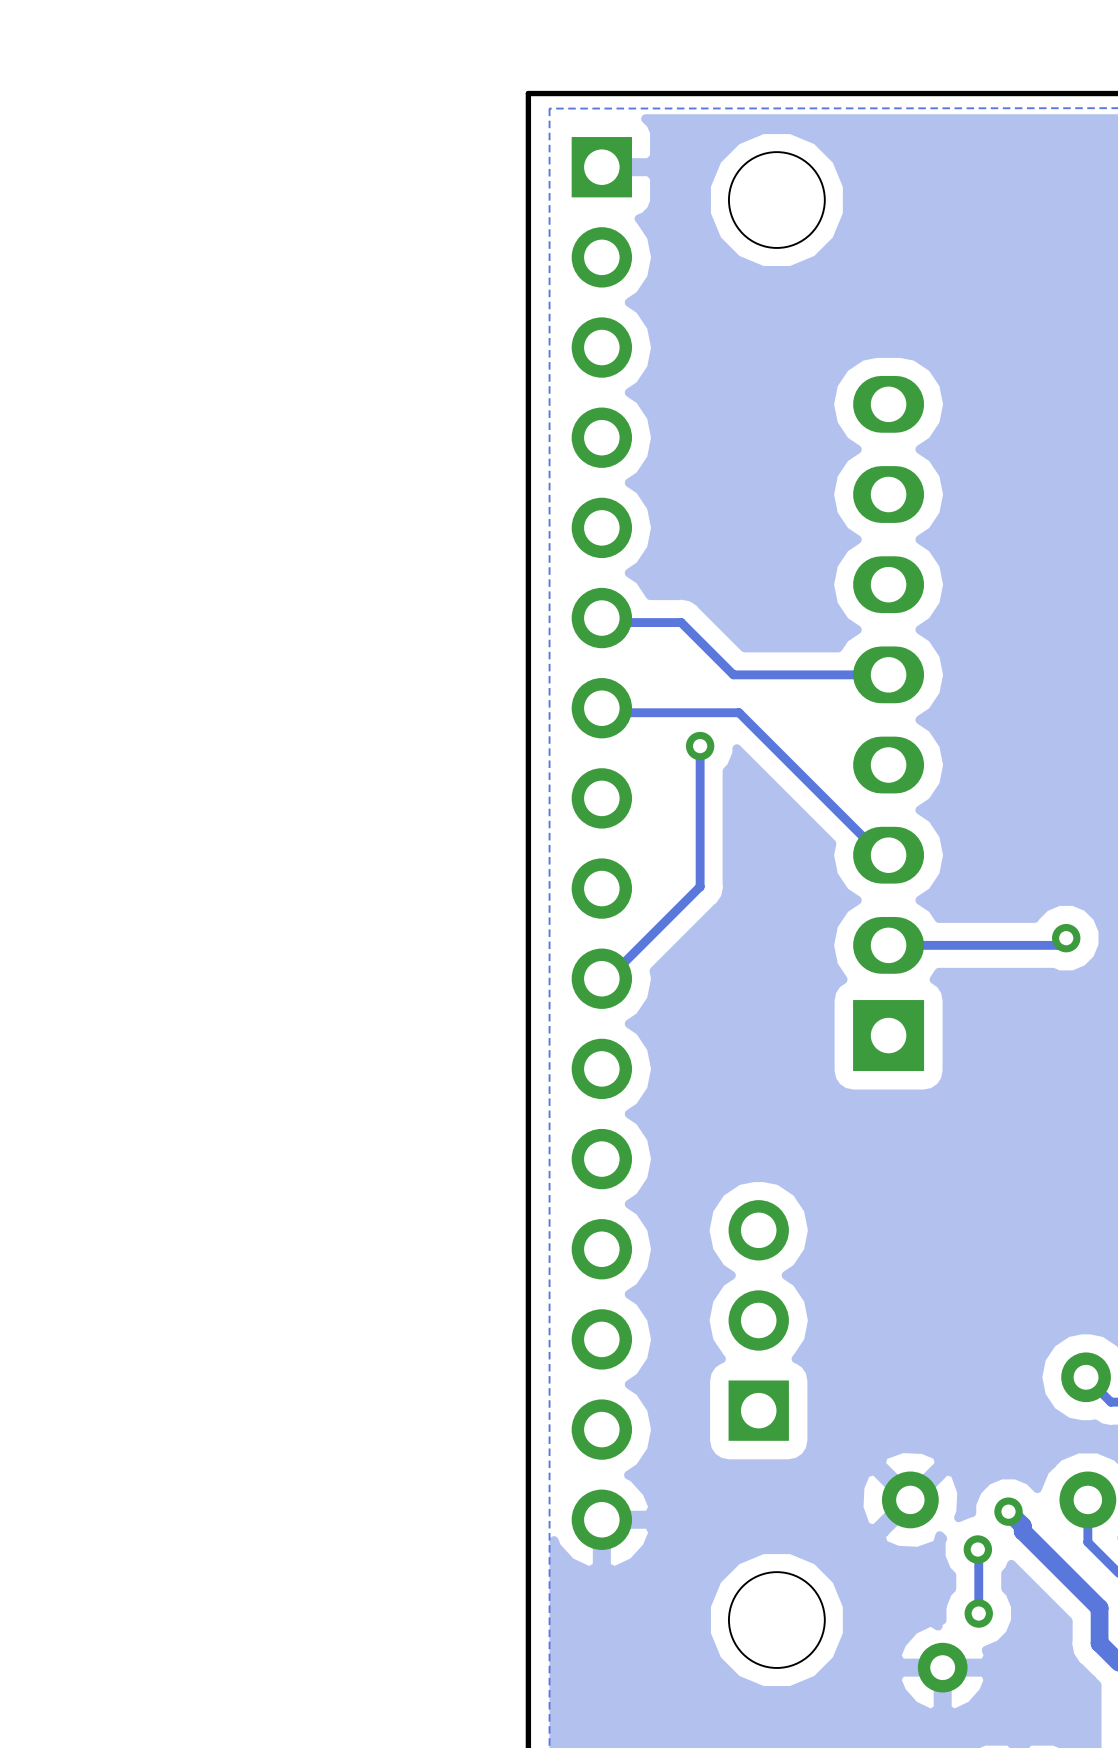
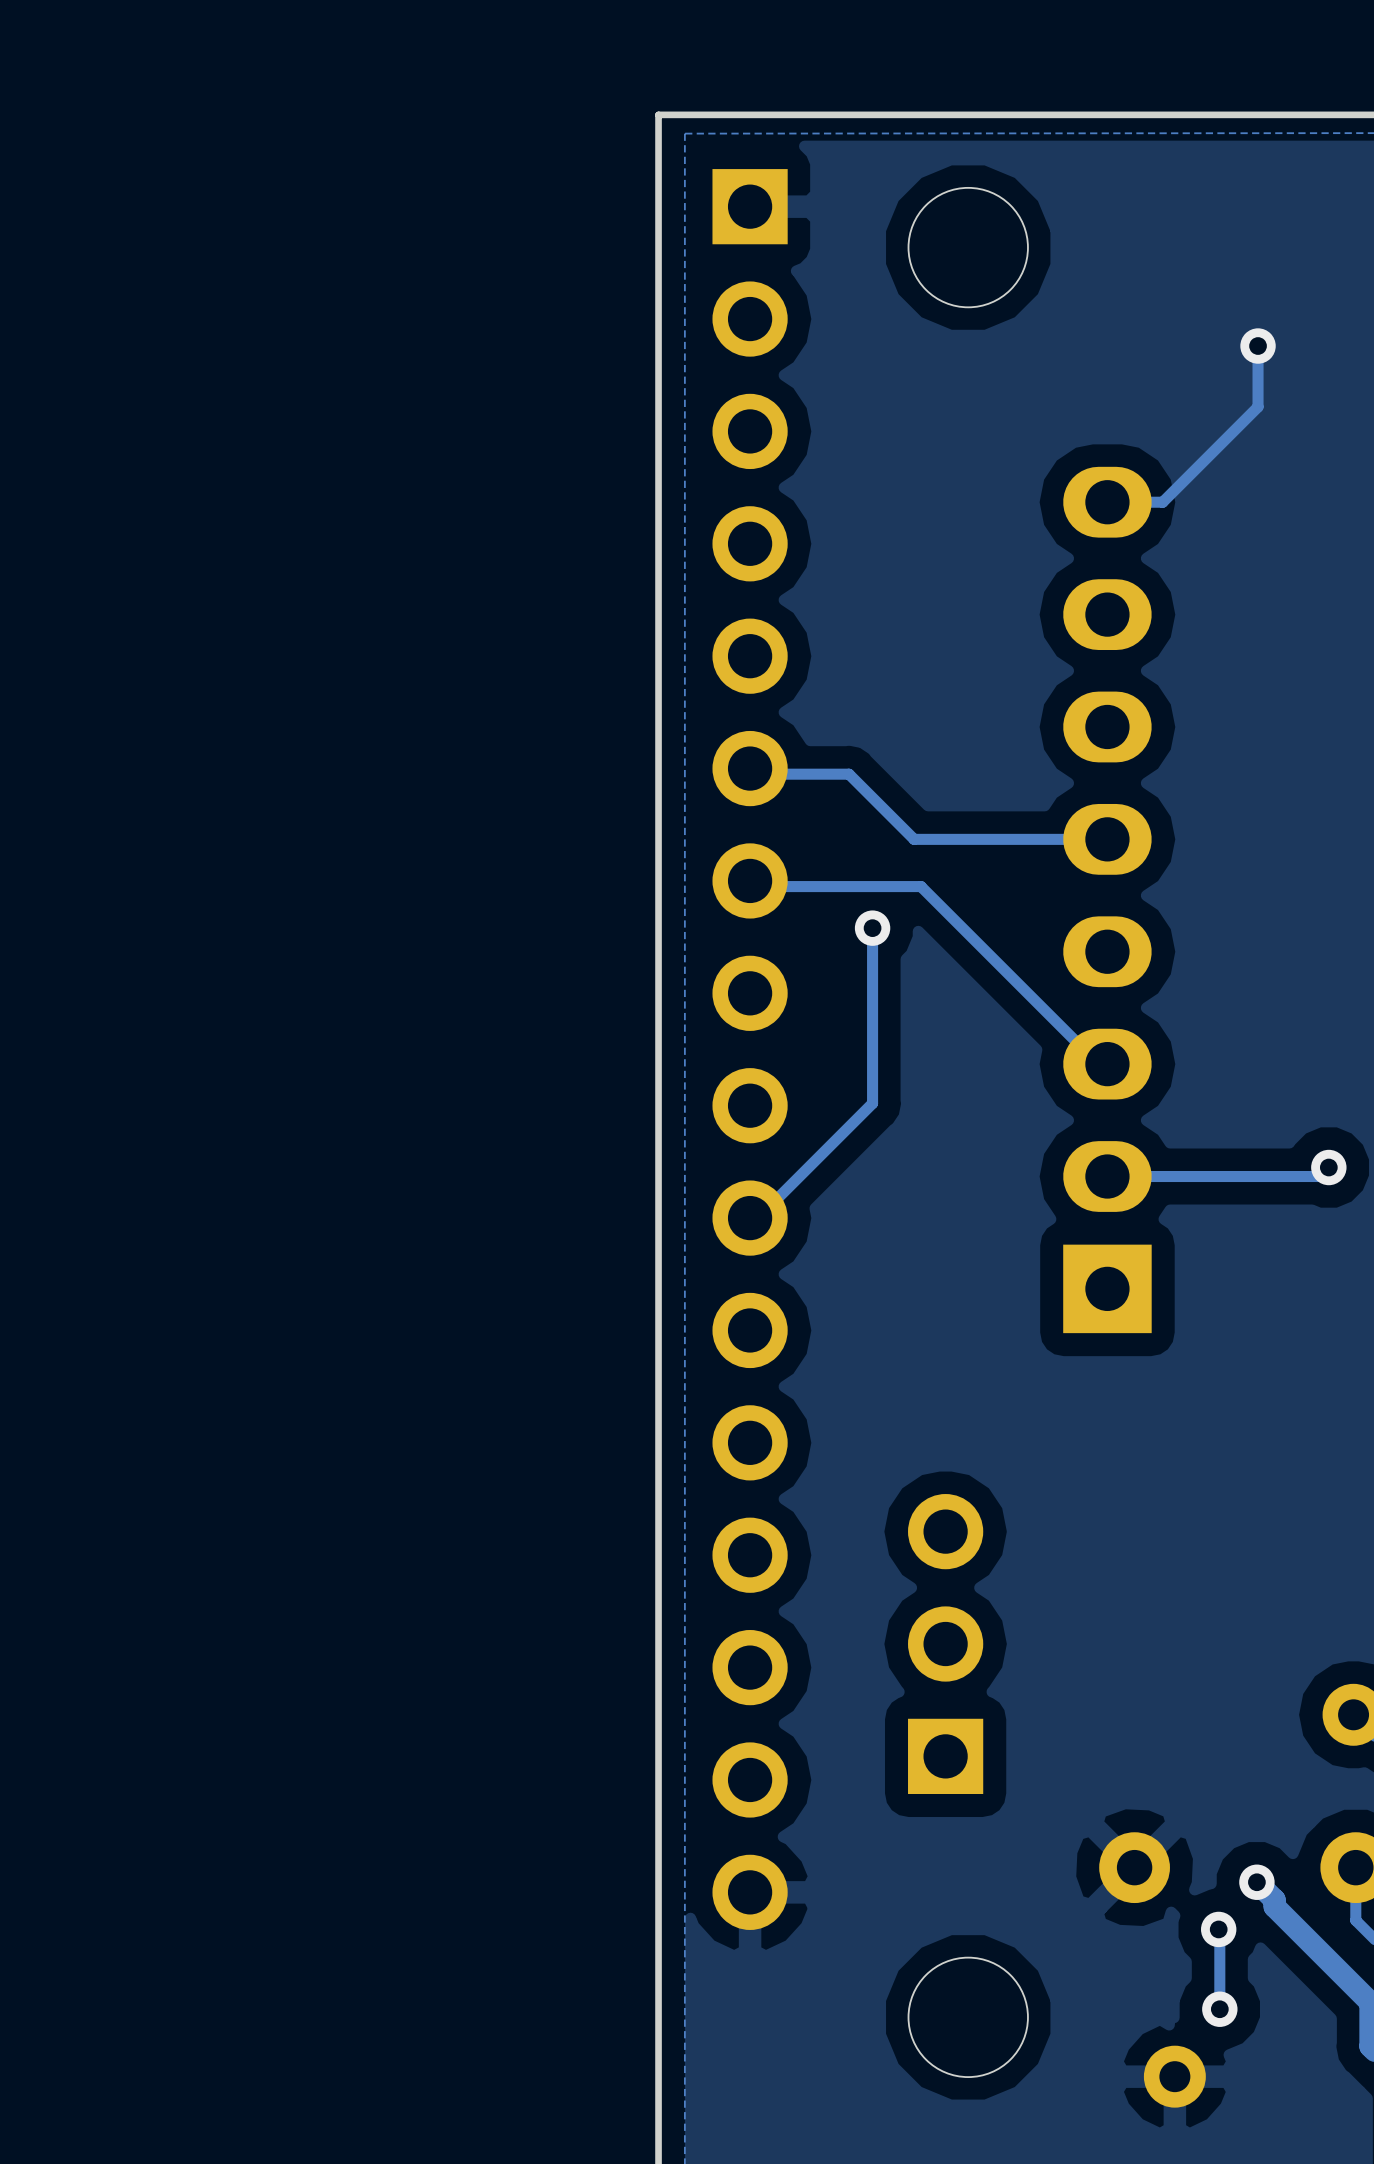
track: none -> (1258, 343) (1258, 406) (1162, 502) (1107, 502)
via: none -> (1258, 346)

